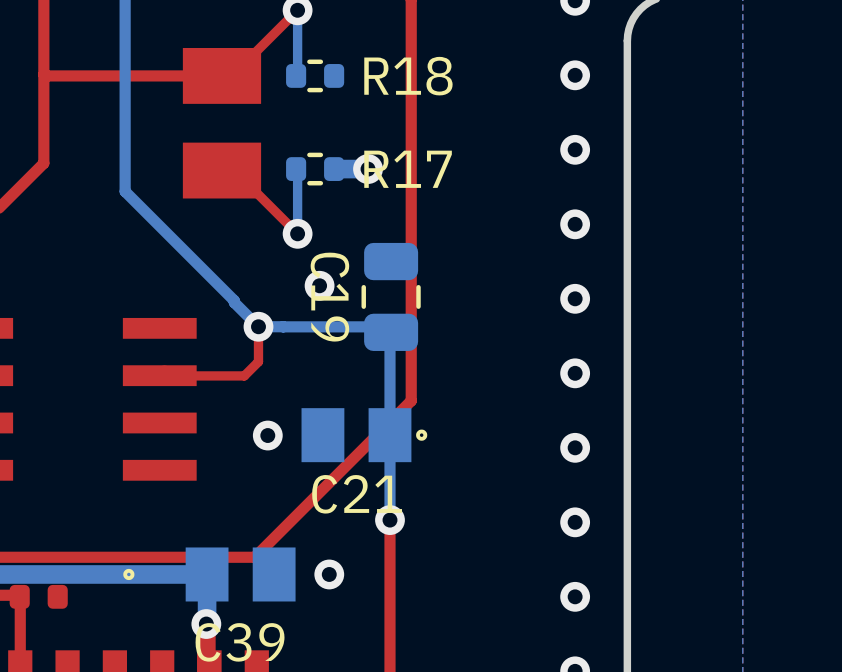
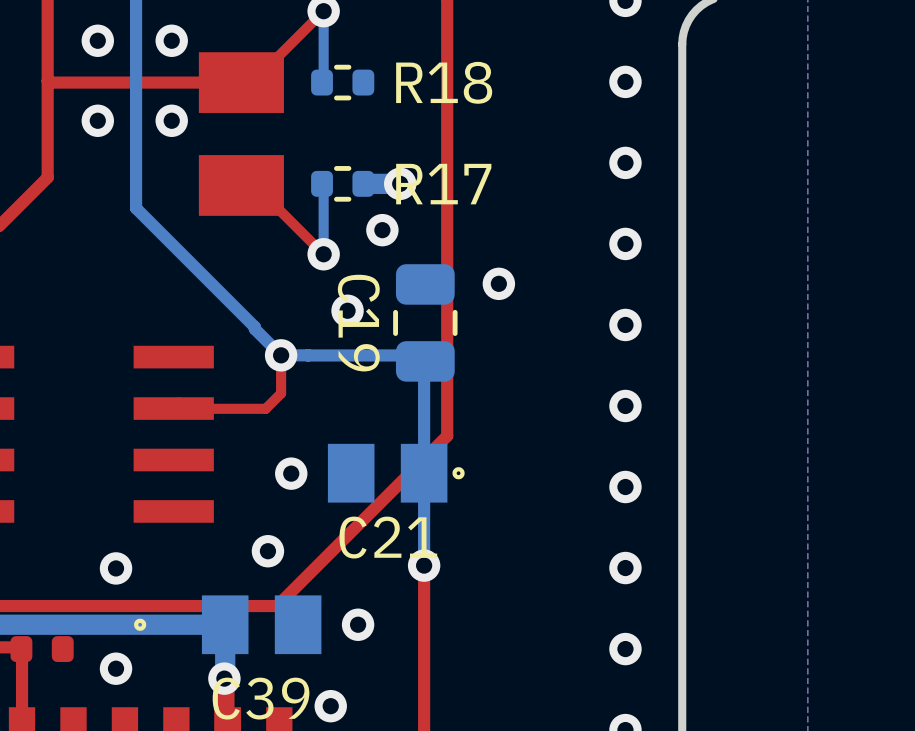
via: none -> (97, 40)
via: none -> (171, 40)
via: none -> (97, 120)
via: none -> (171, 120)
via: none -> (382, 230)
via: none -> (498, 283)
via: none -> (267, 551)
via: none -> (116, 568)
via: none -> (116, 668)
via: none -> (330, 706)

